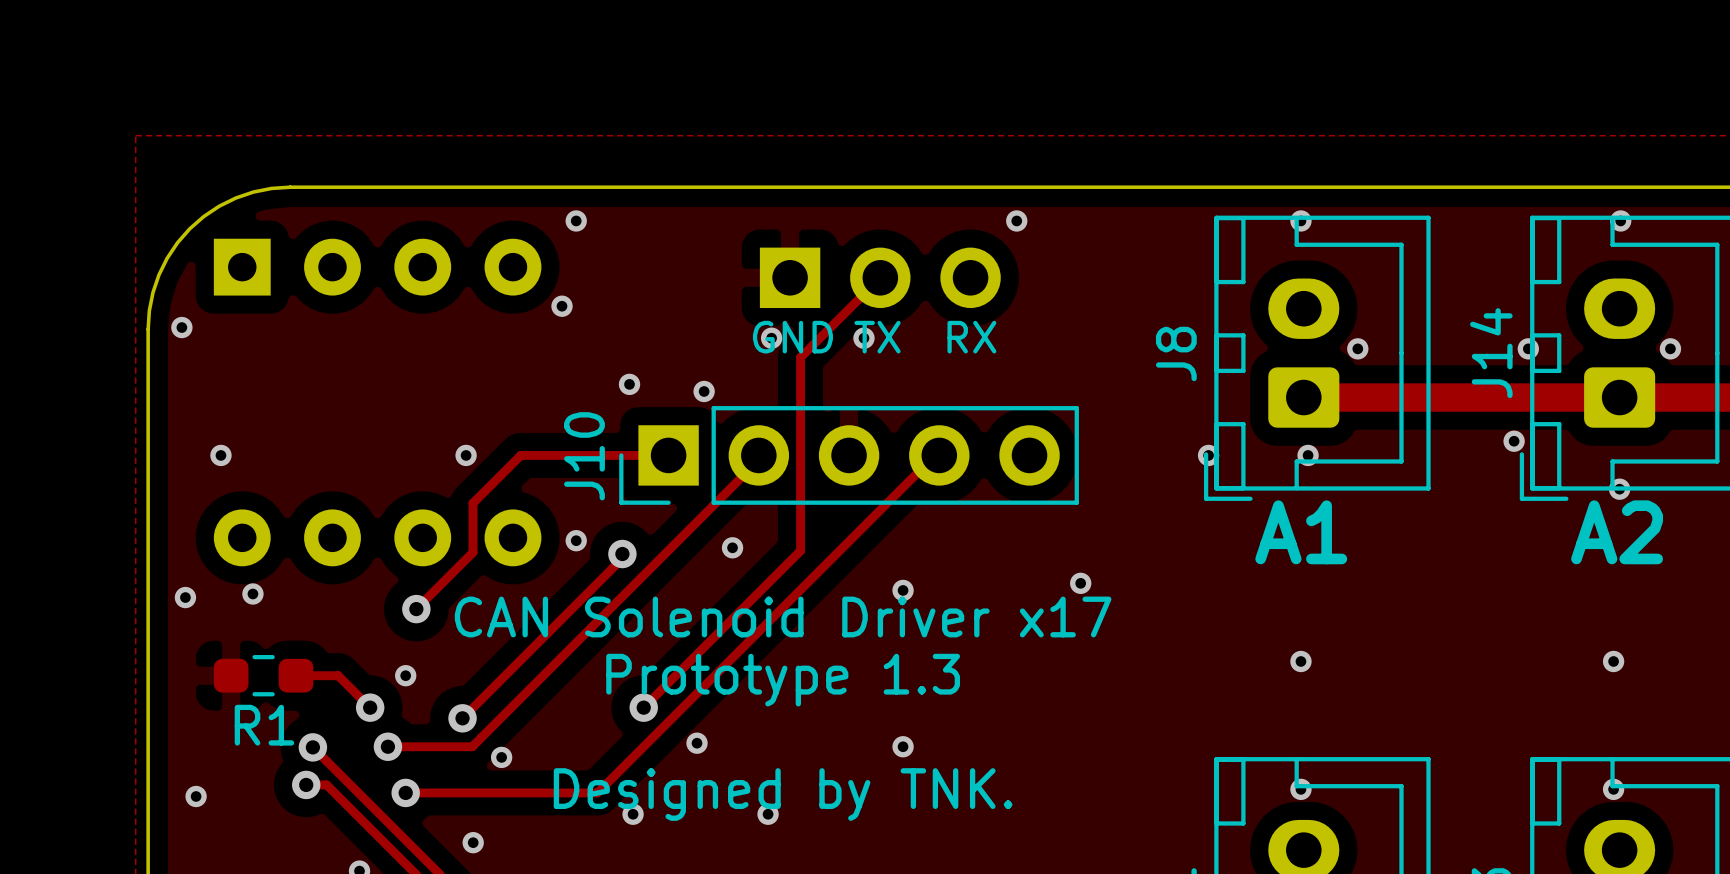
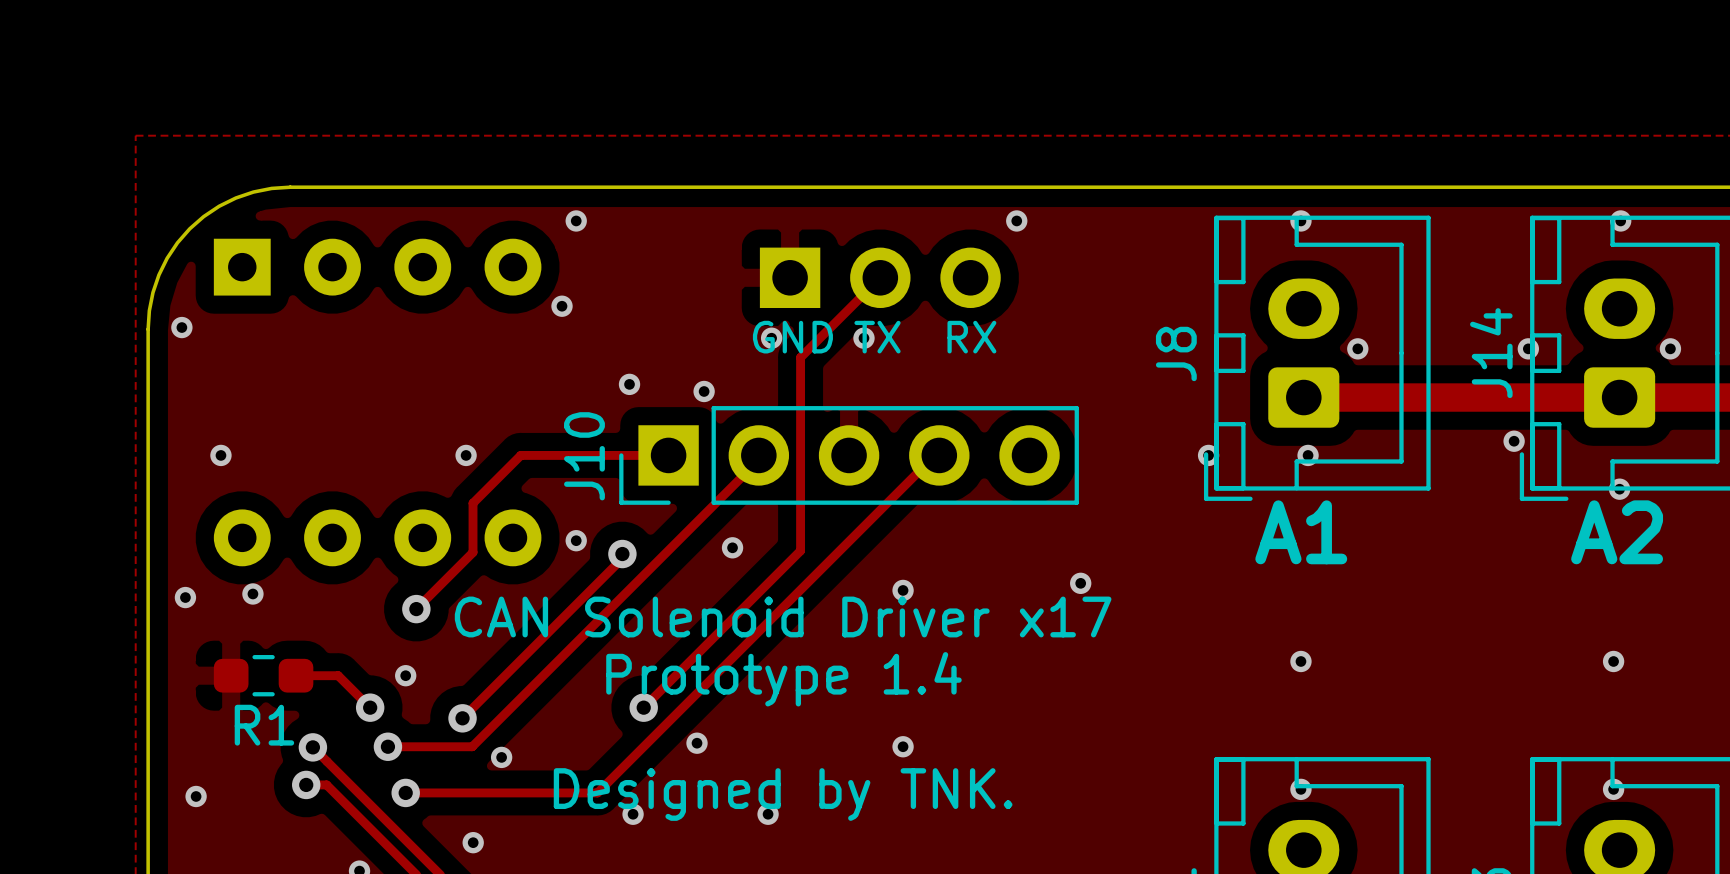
text: Prototype 1.3 (783, 680) -> Prototype 1.4 (783, 679)

